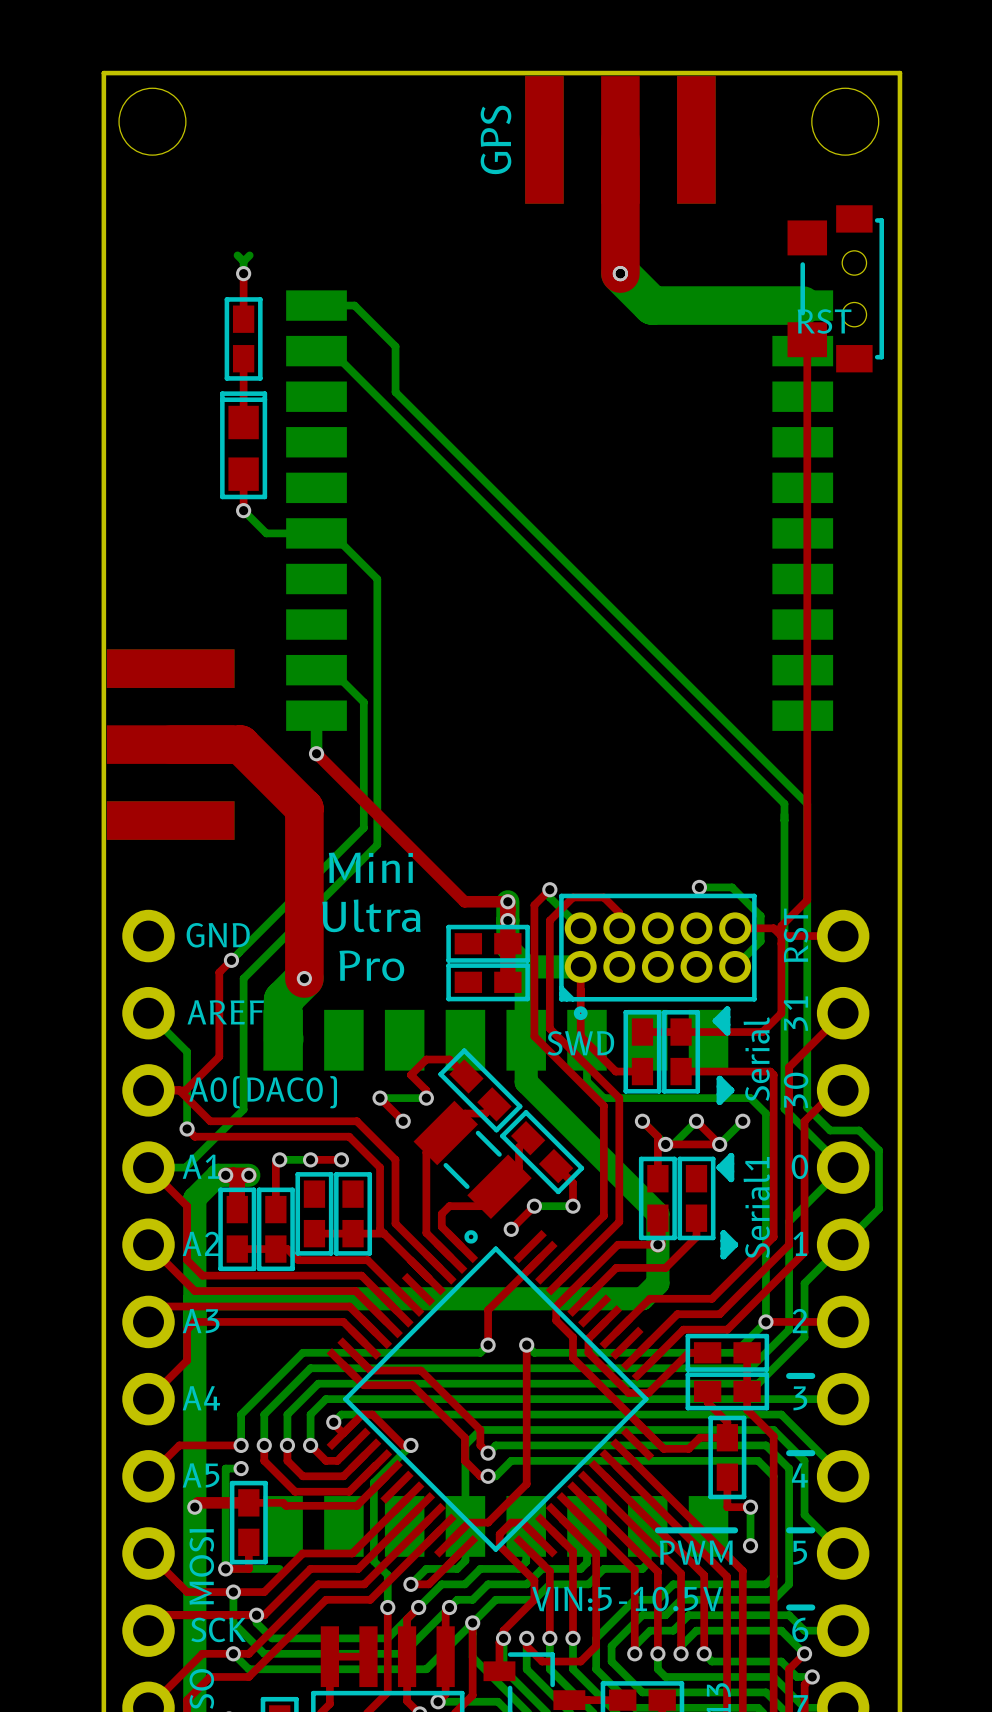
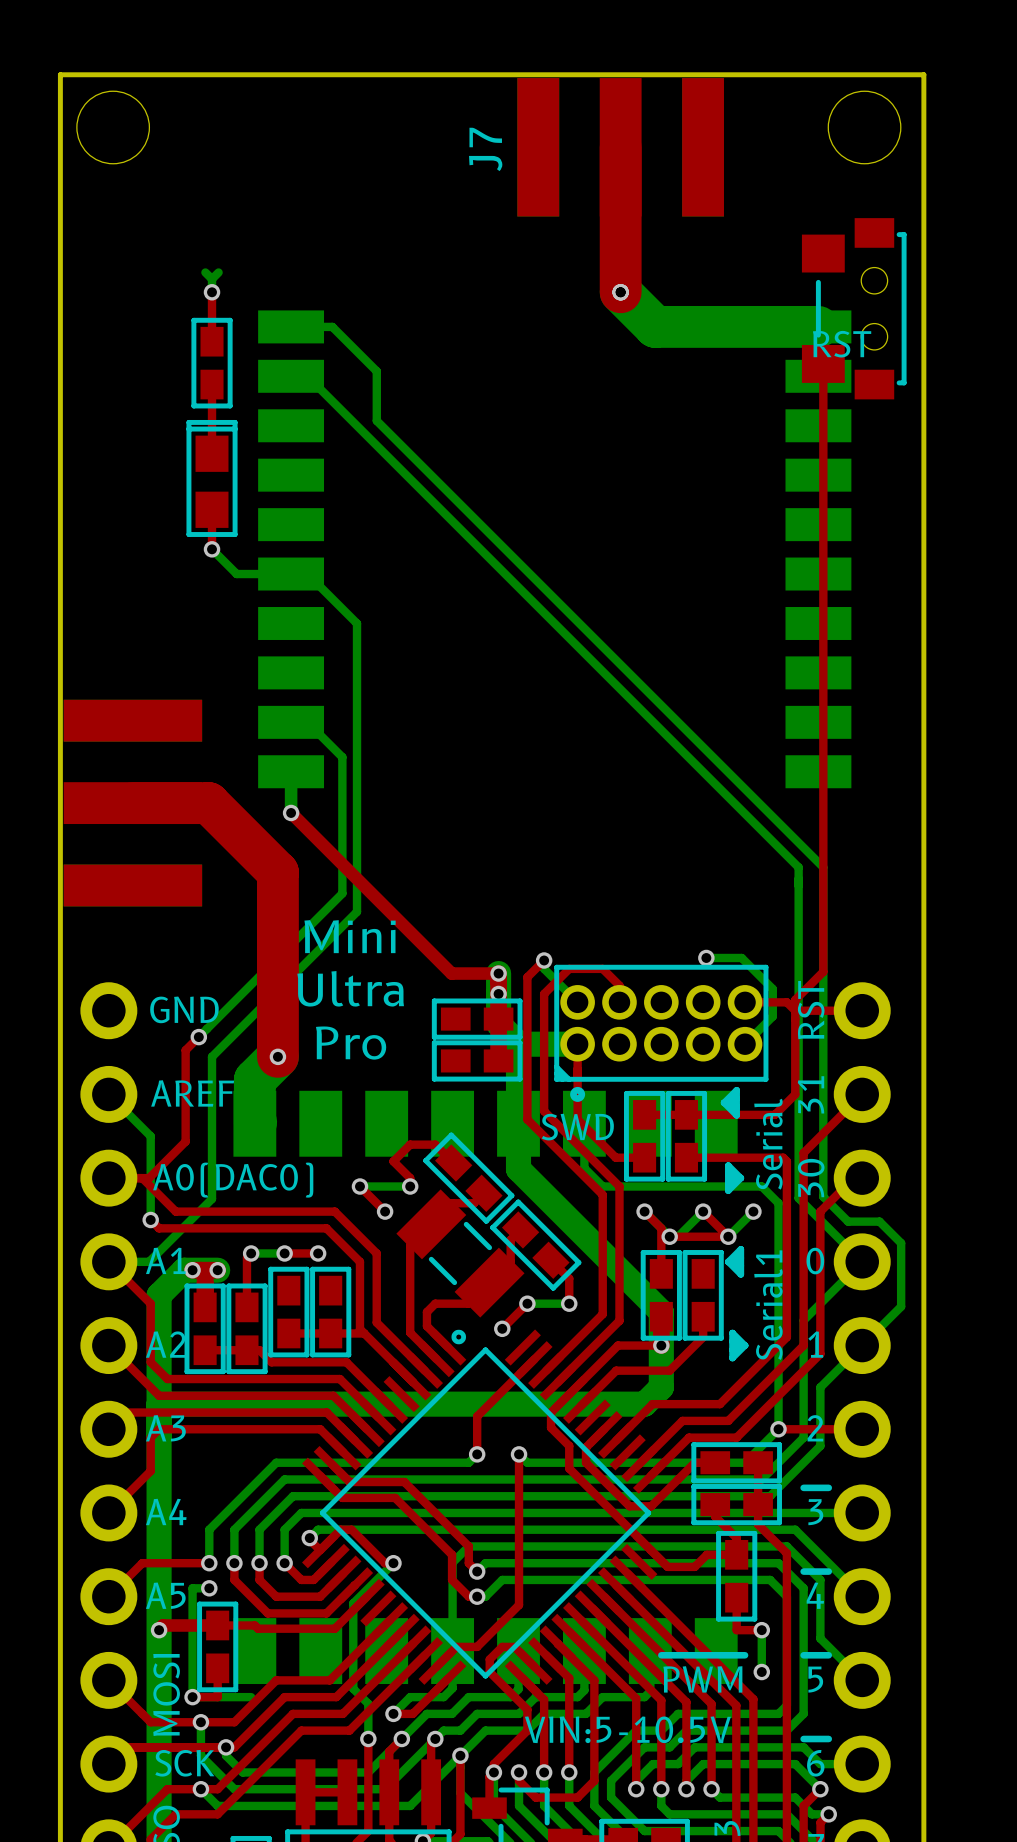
GPS name: GPS (495, 139) -> J7 (485, 149)

